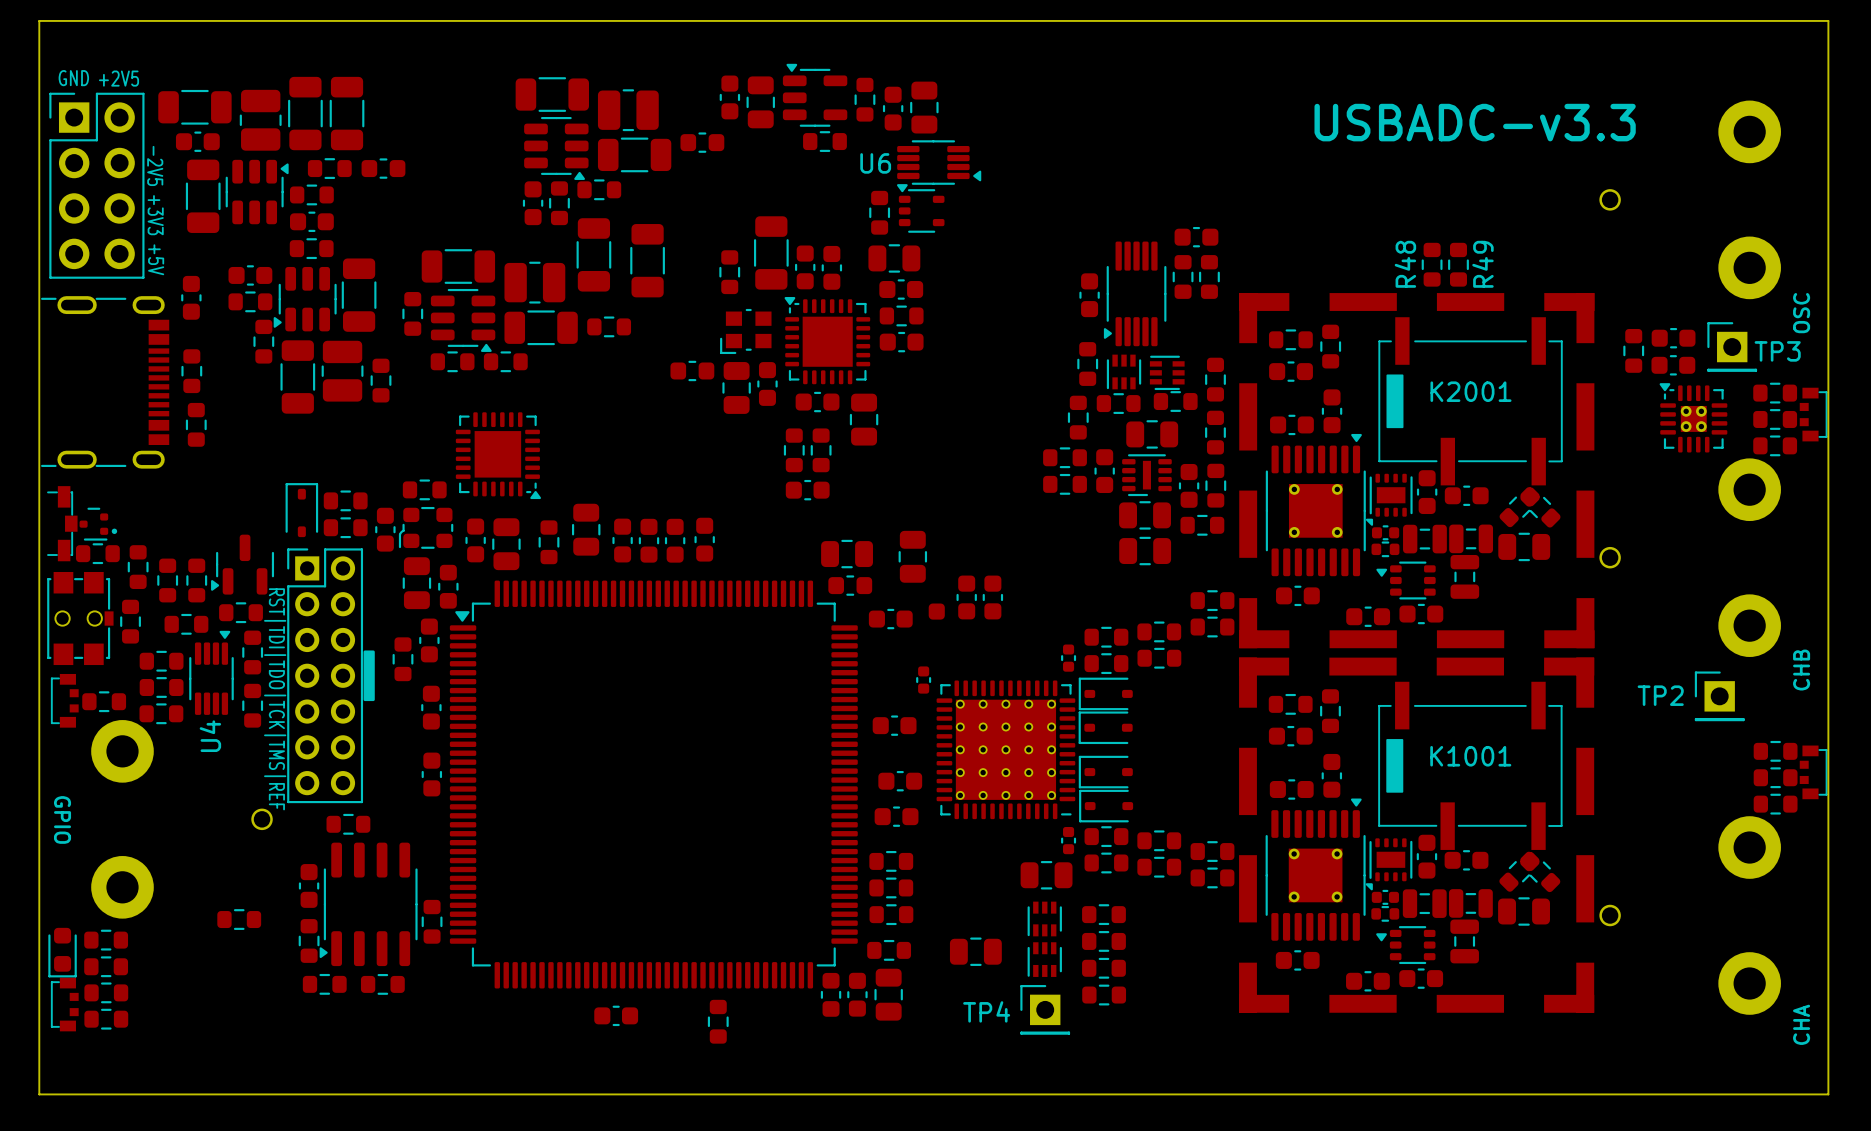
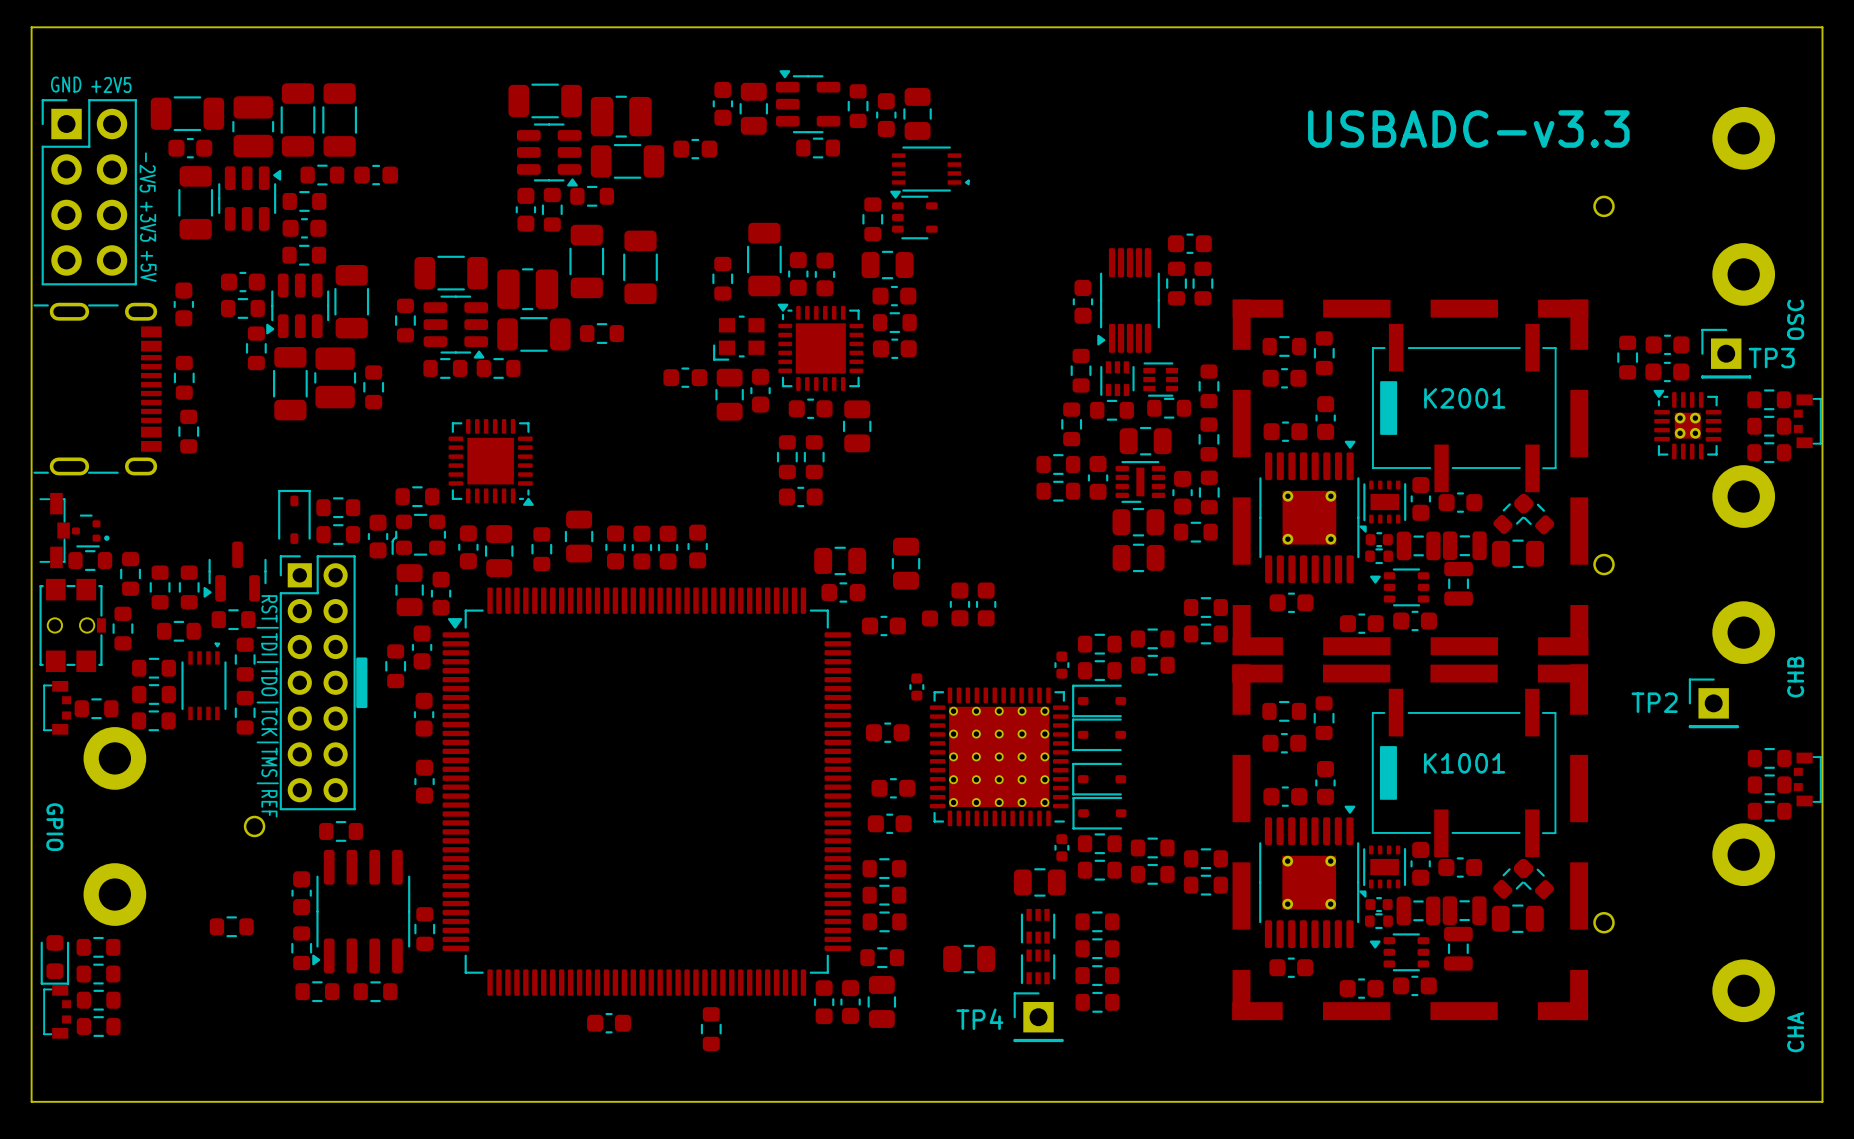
part: none -> (930, 169)
U6: (939, 162) -> none
R48: (1432, 264) -> none
R49: (1458, 264) -> none
U4: (211, 672) -> none
part: none -> (203, 681)

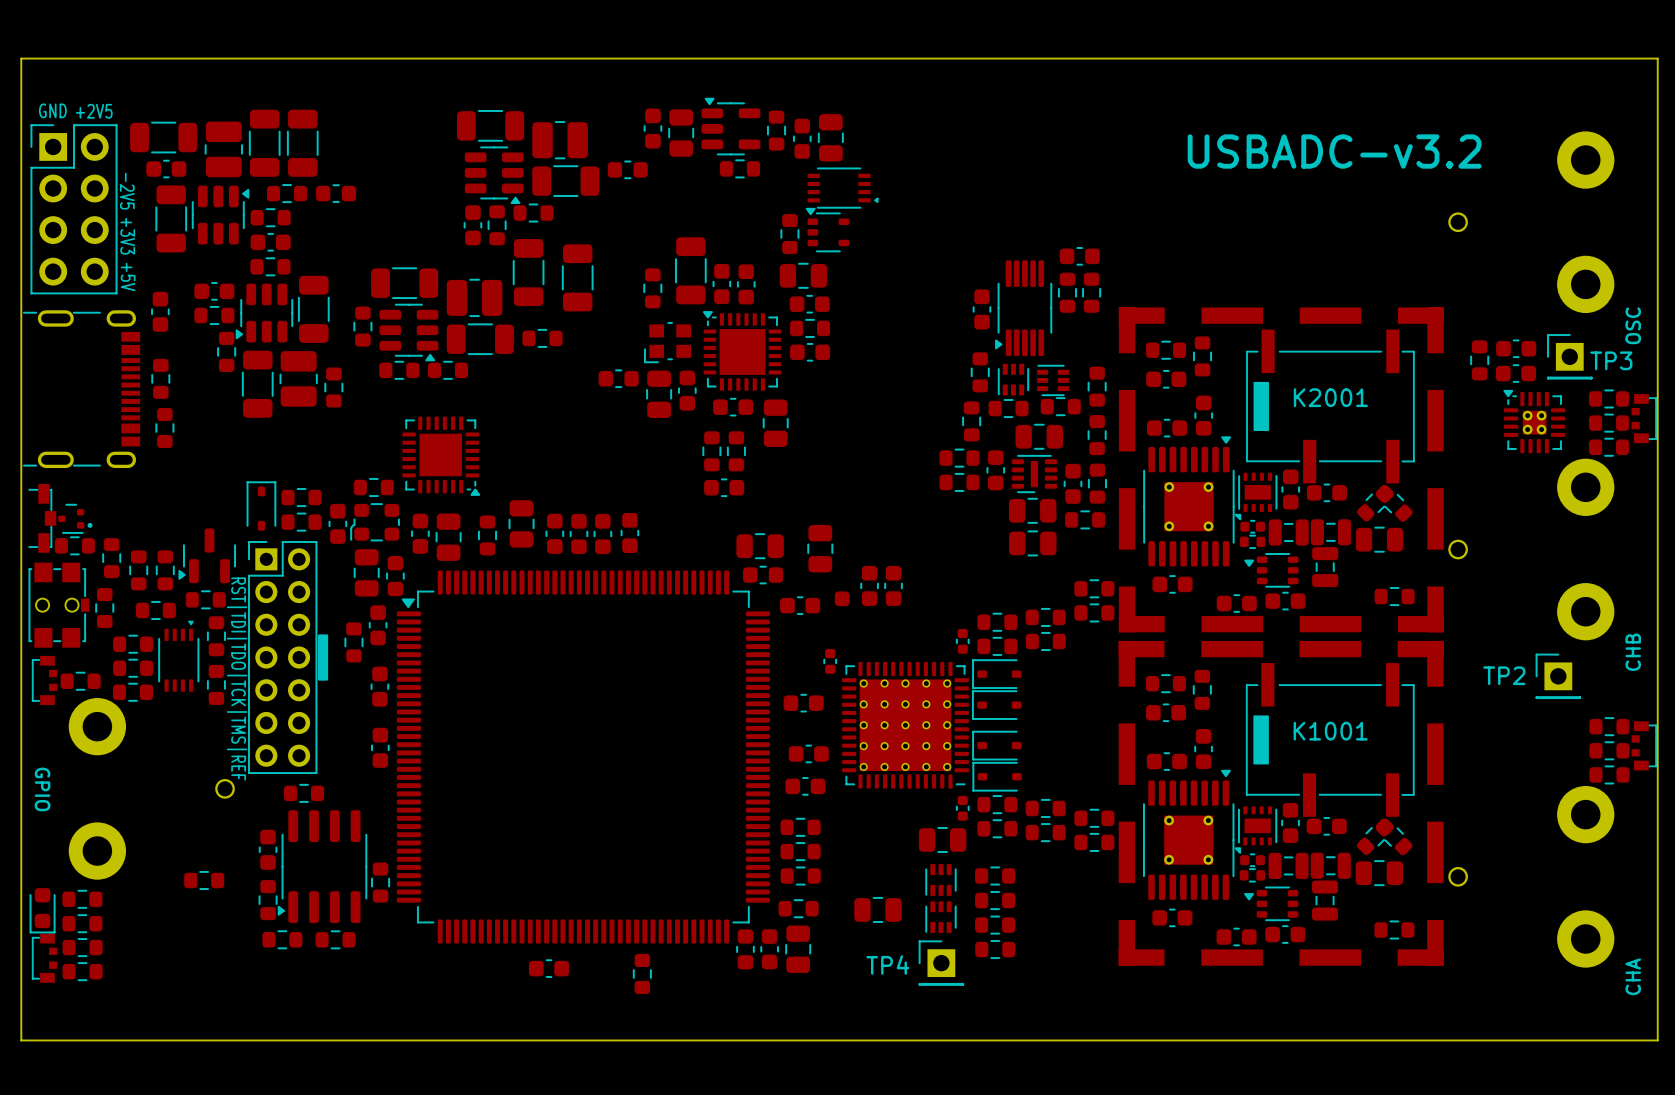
text: USBADC-v3.3 (1468, 129) -> USBADC-v3.2 (1334, 151)
part: none -> (1394, 596)
part: none -> (1394, 930)

